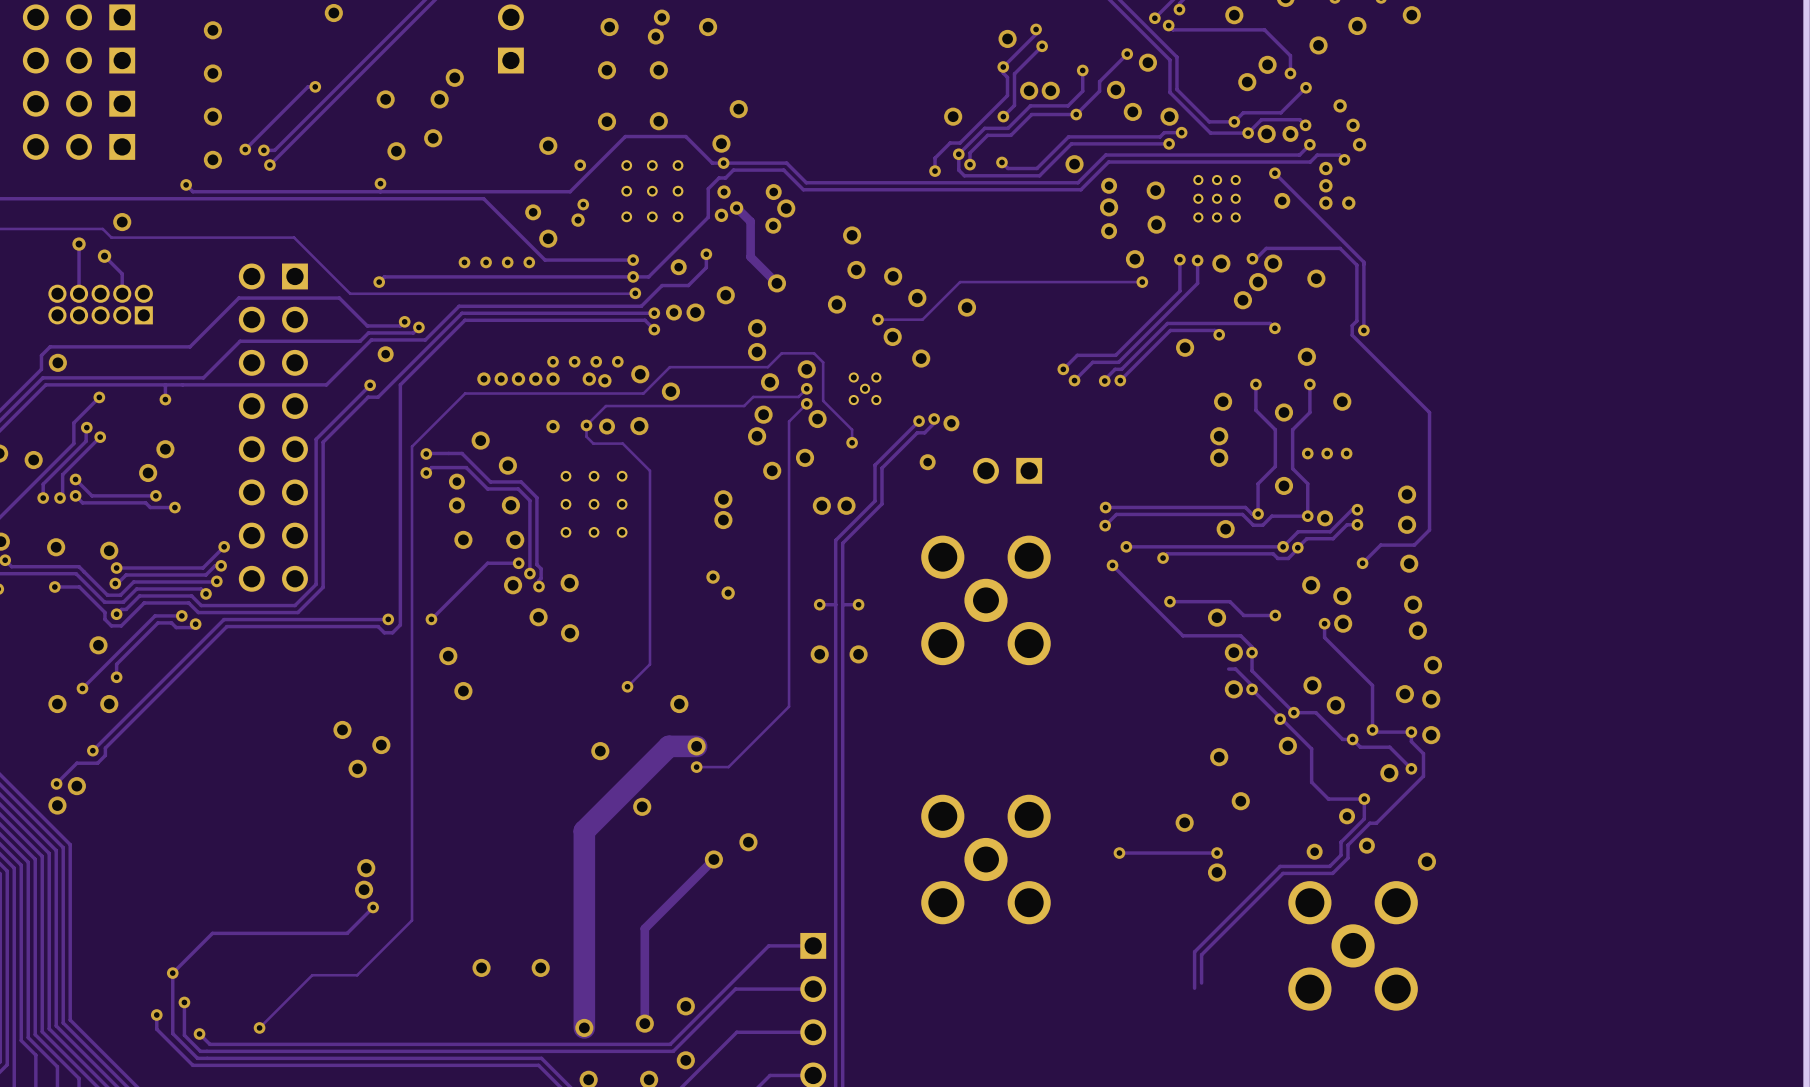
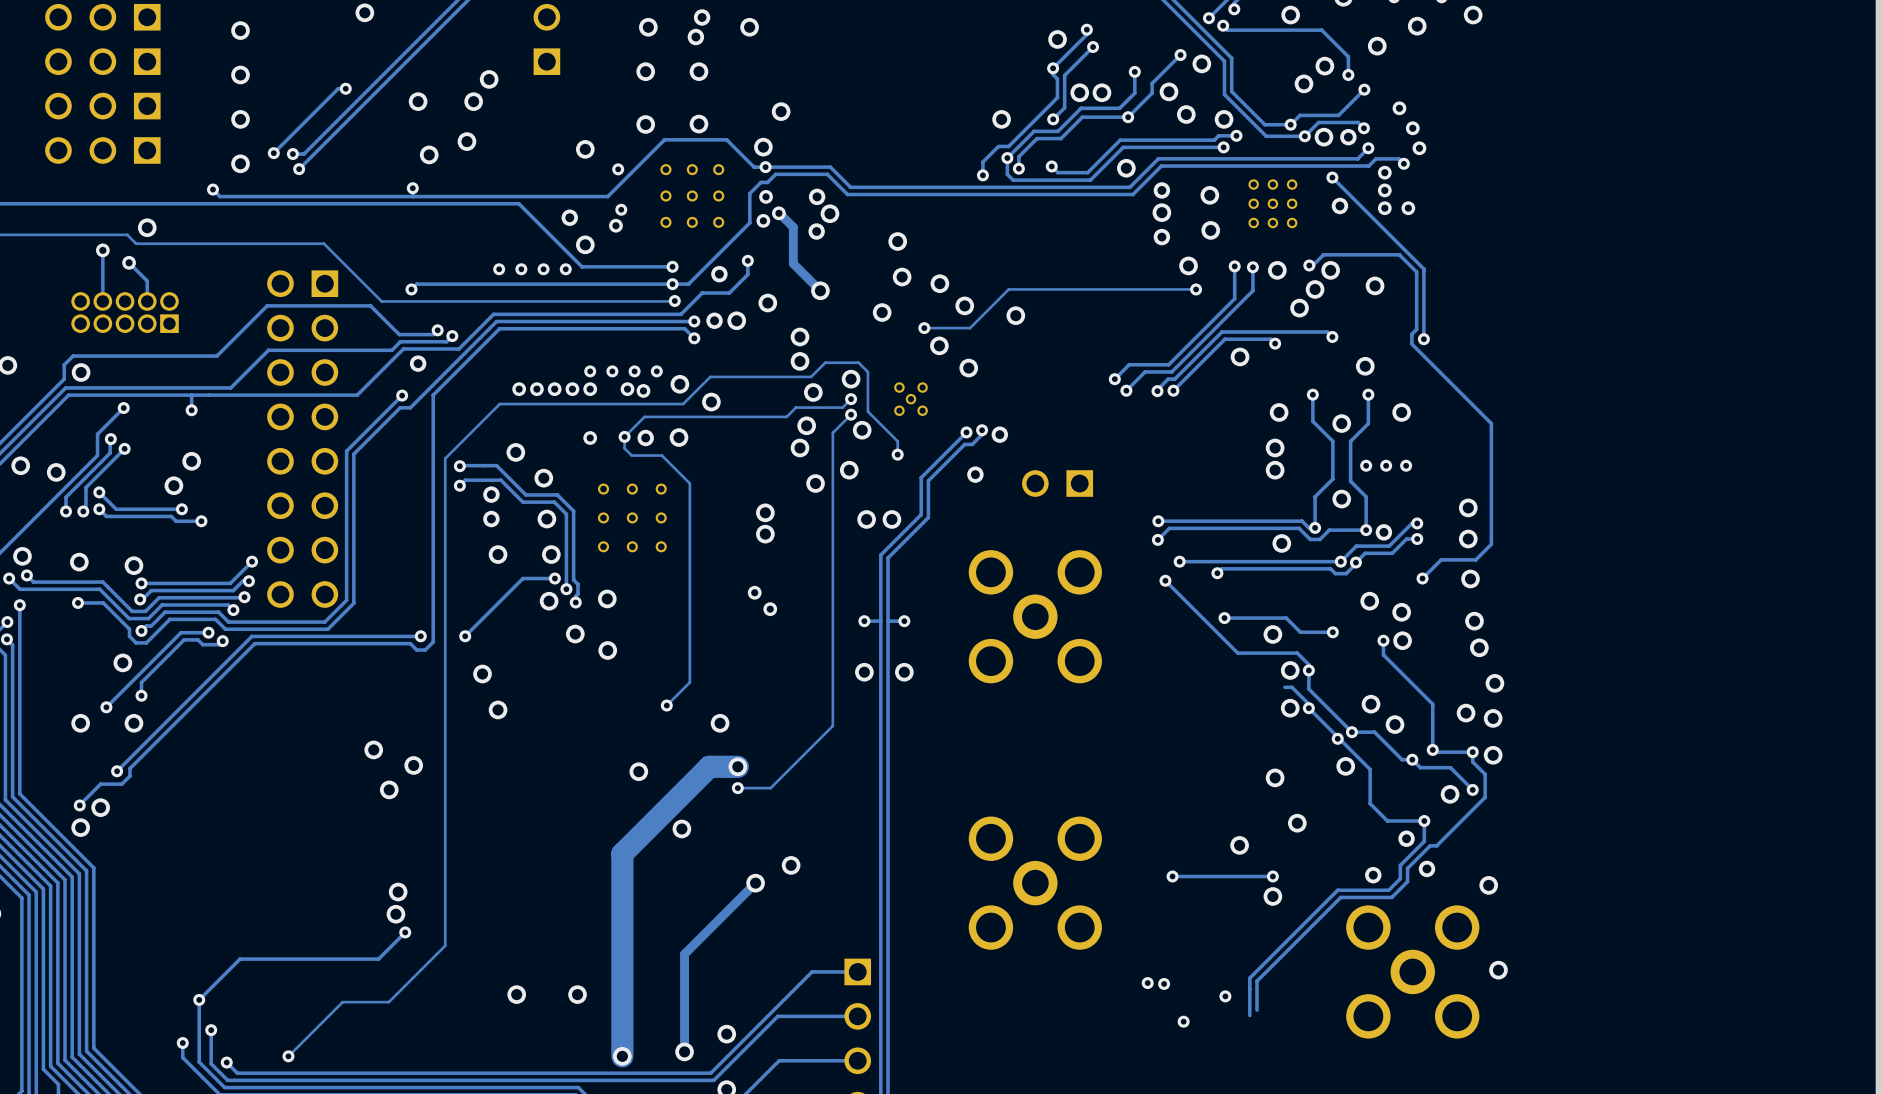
via: none -> (1498, 970)
via: none -> (1147, 983)
via: none -> (1164, 983)
via: none -> (1225, 996)
via: none -> (1183, 1021)

